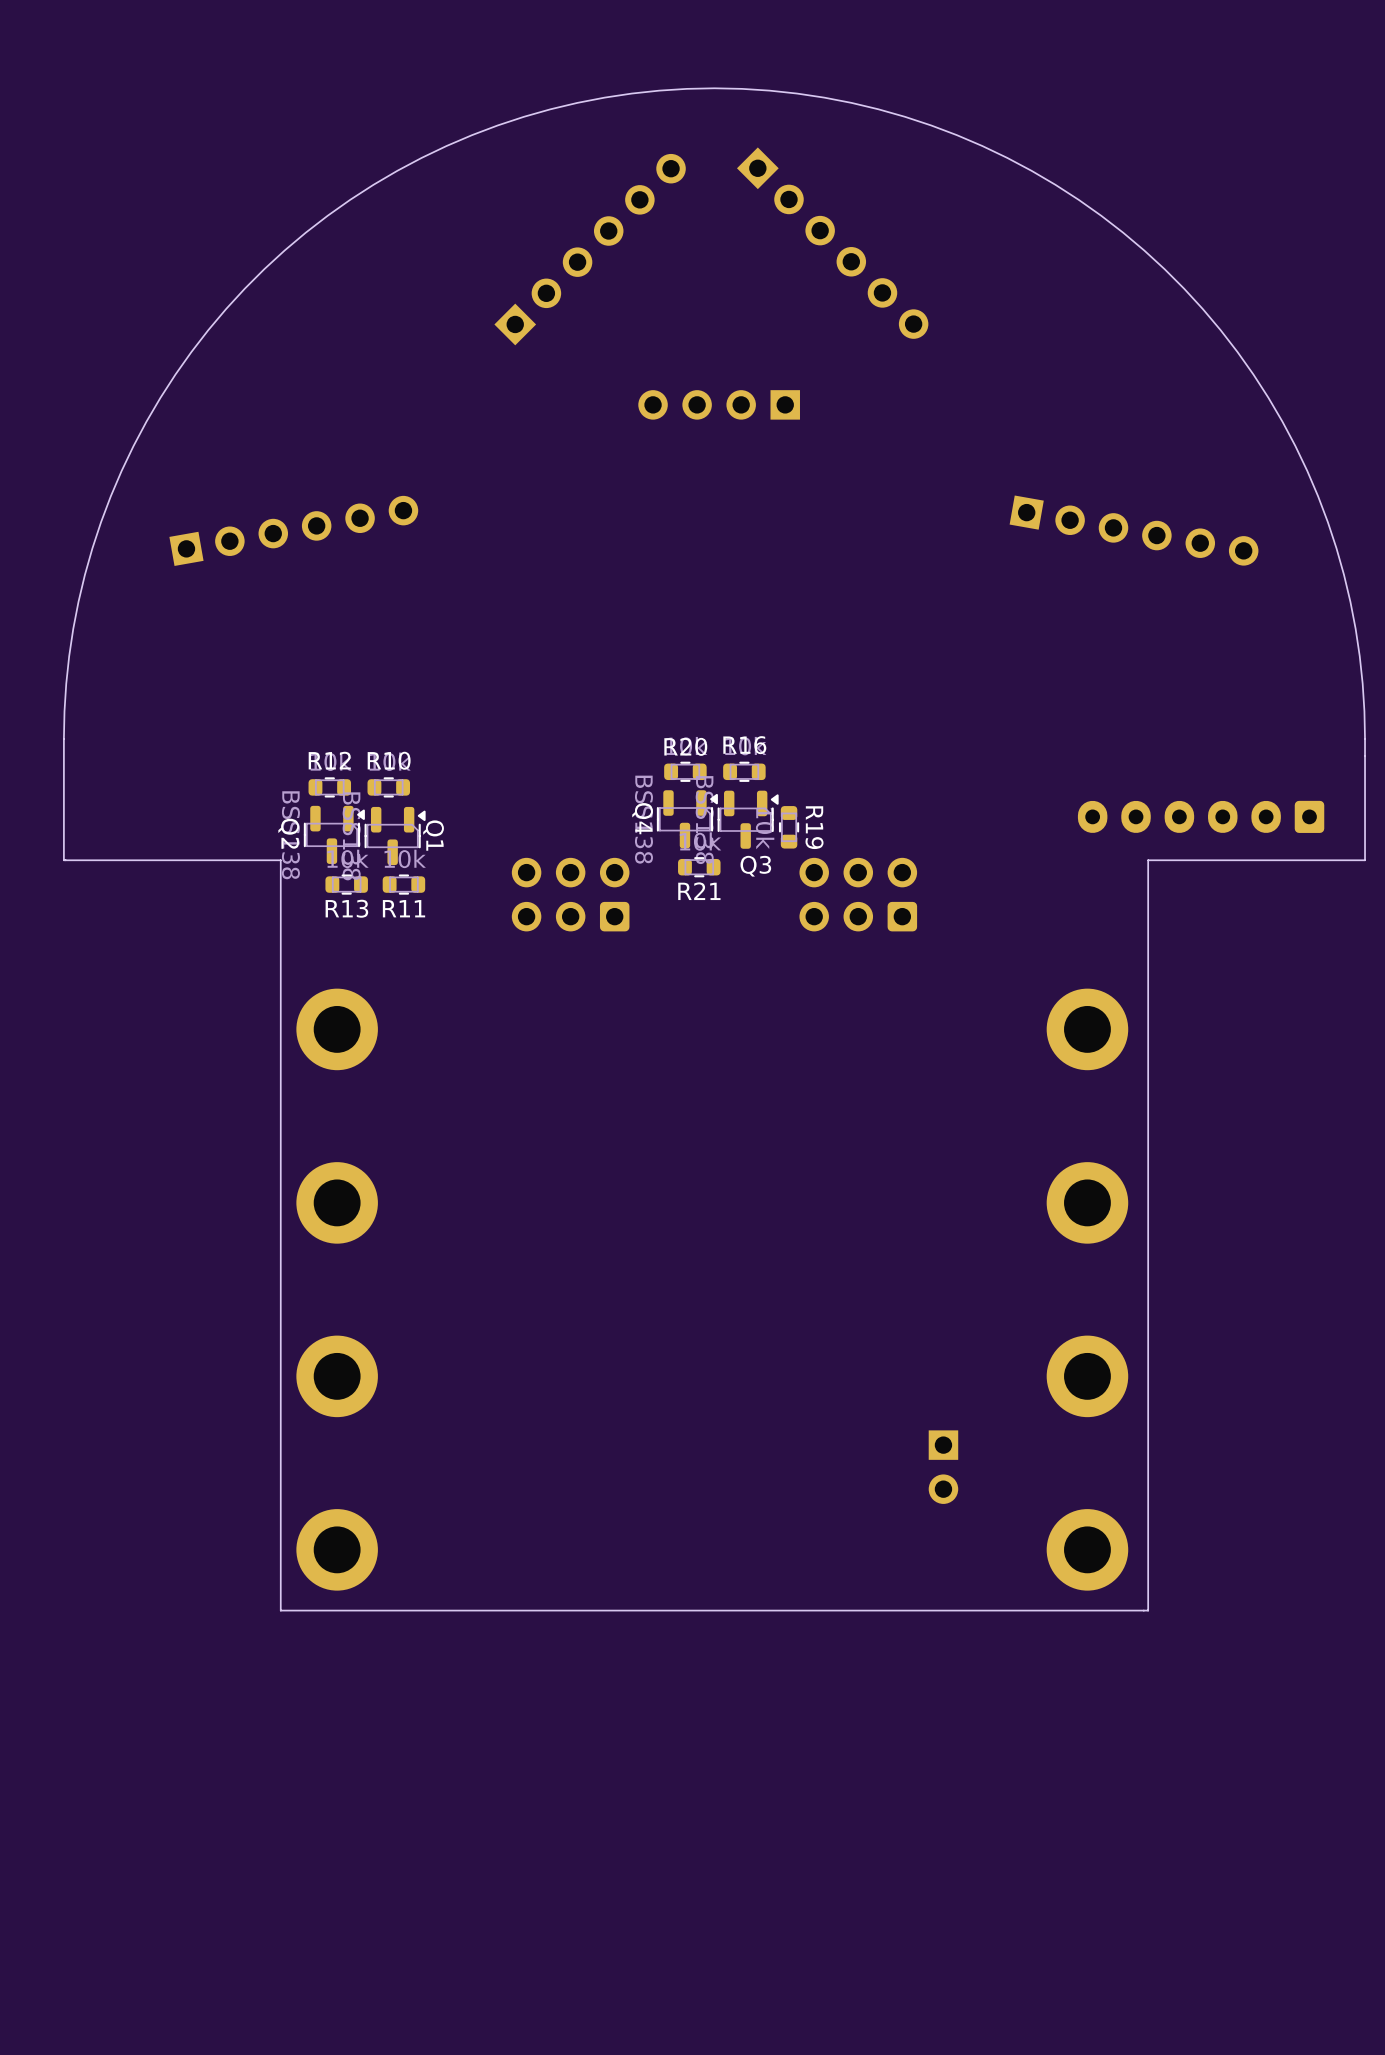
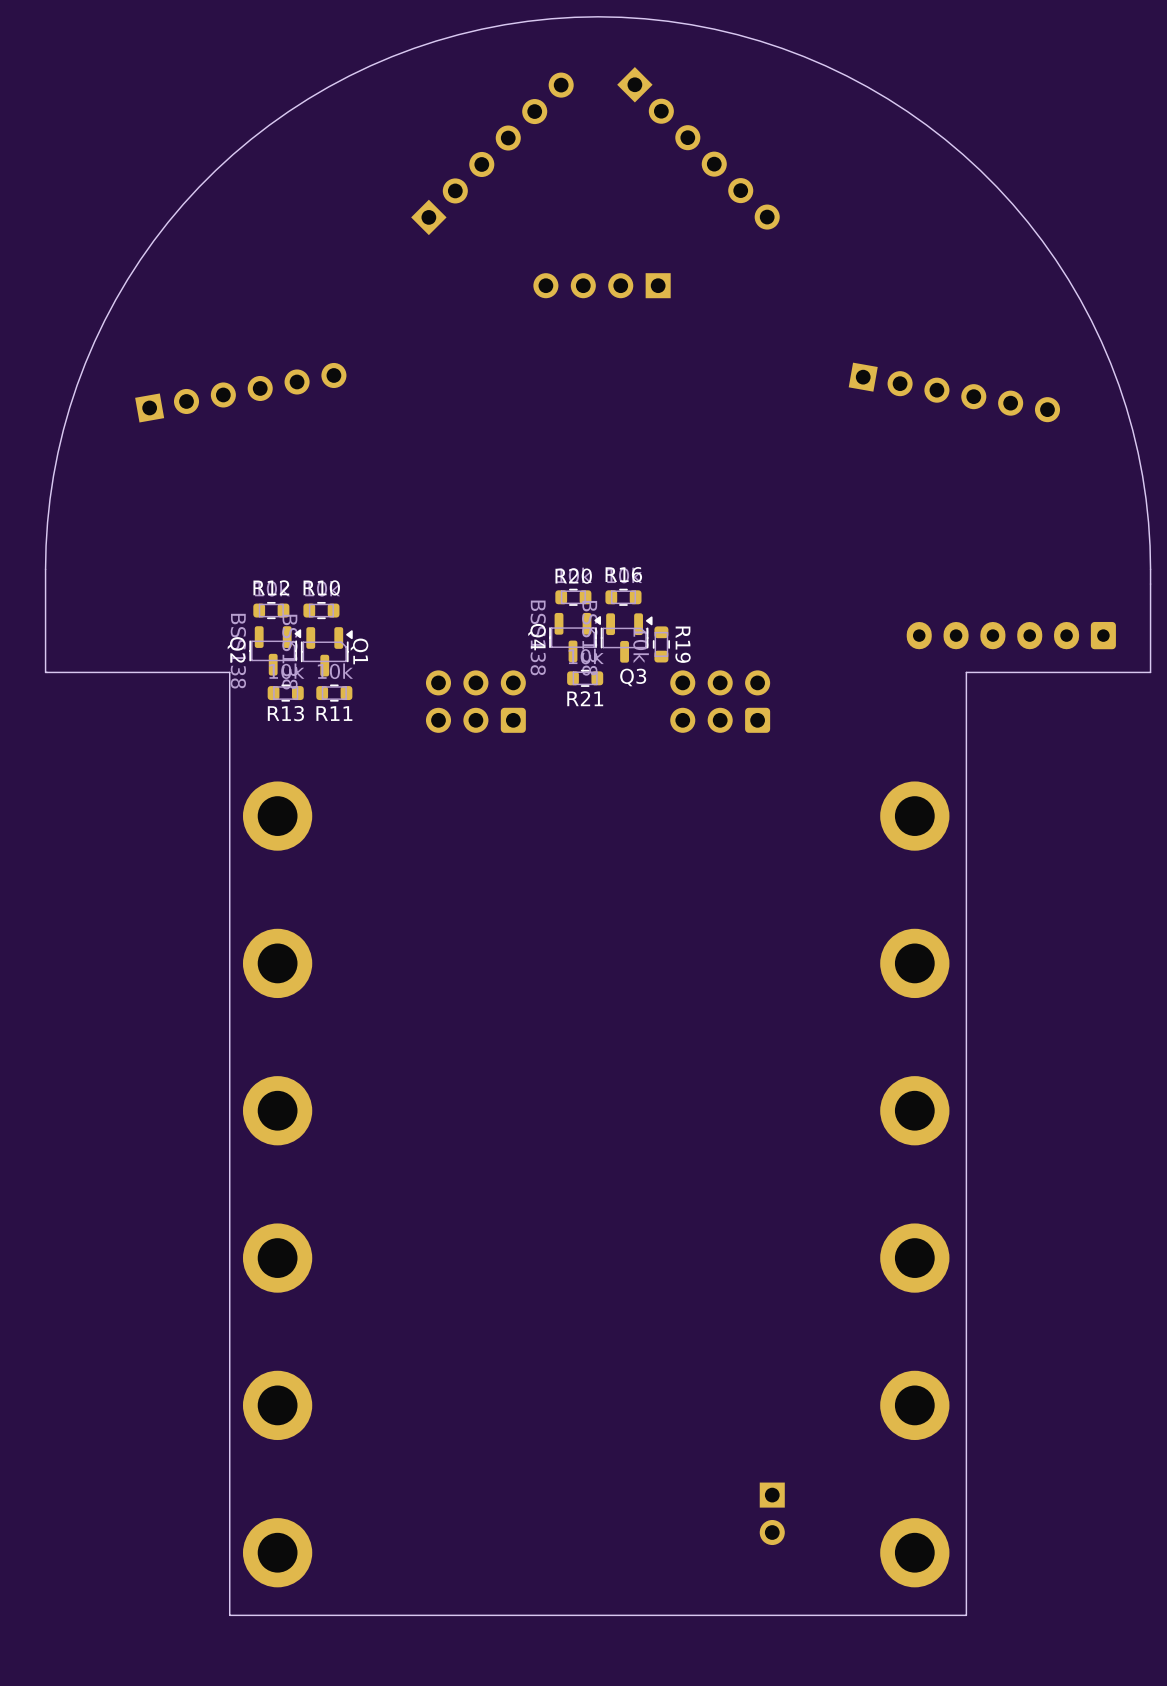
part position: (943, 1467) -> (772, 1513)
board edge: (1148, 1610) (280, 1610) -> (966, 1309) (966, 1615) (229, 1615) (229, 1309)
part: none -> (277, 1405)
part: none -> (914, 1405)
part: none -> (277, 1552)
part: none -> (914, 1552)

